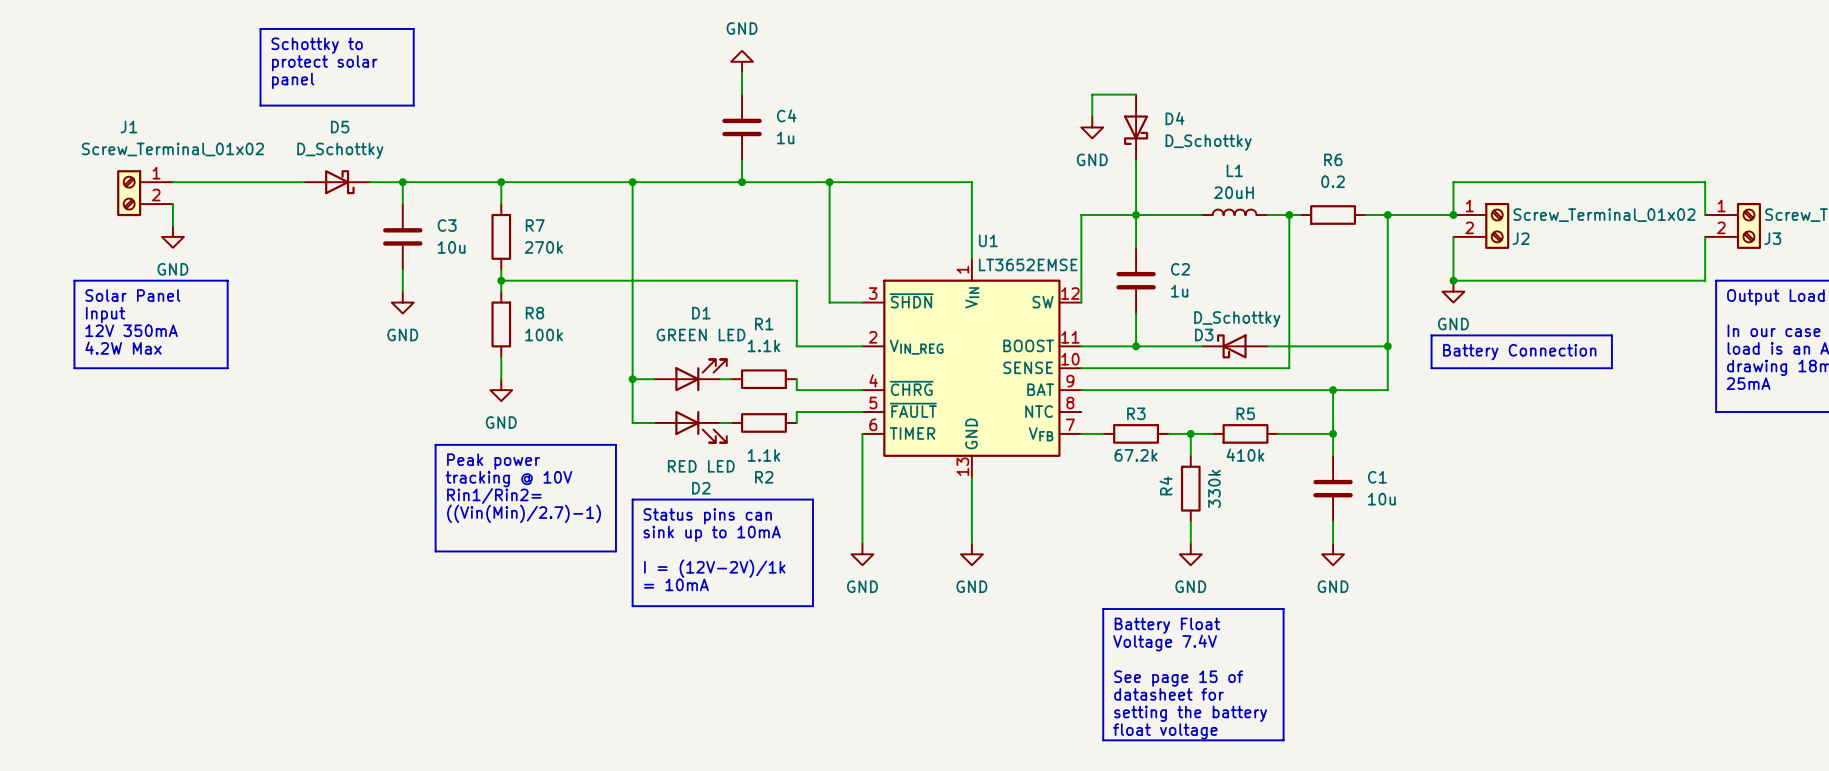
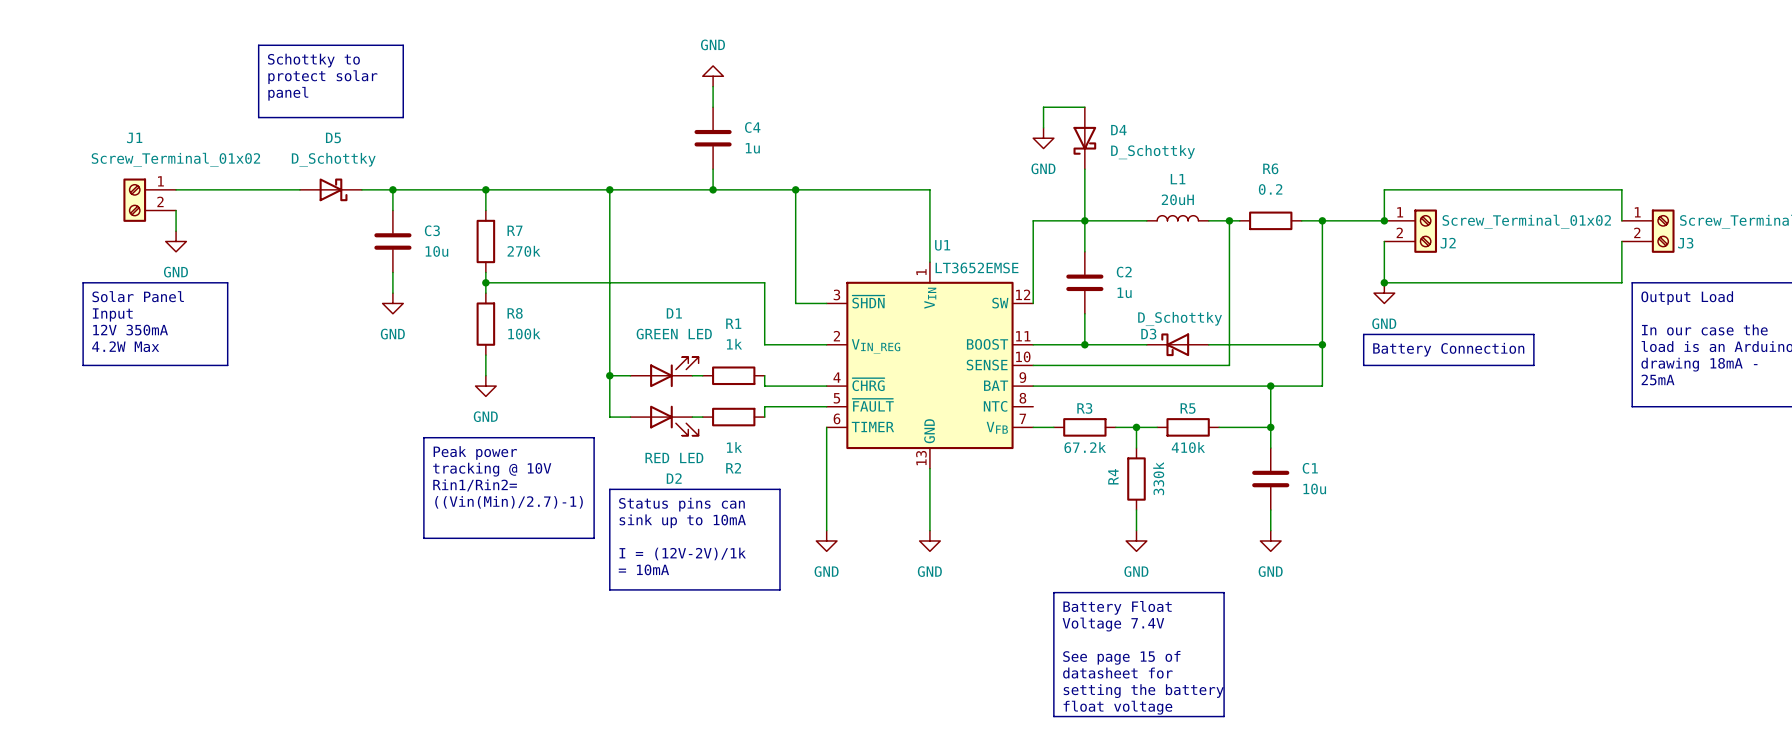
R1 value: 1.1k (763, 345) -> 1k (734, 344)
R2 value: 1.1k (763, 455) -> 1k (734, 447)

